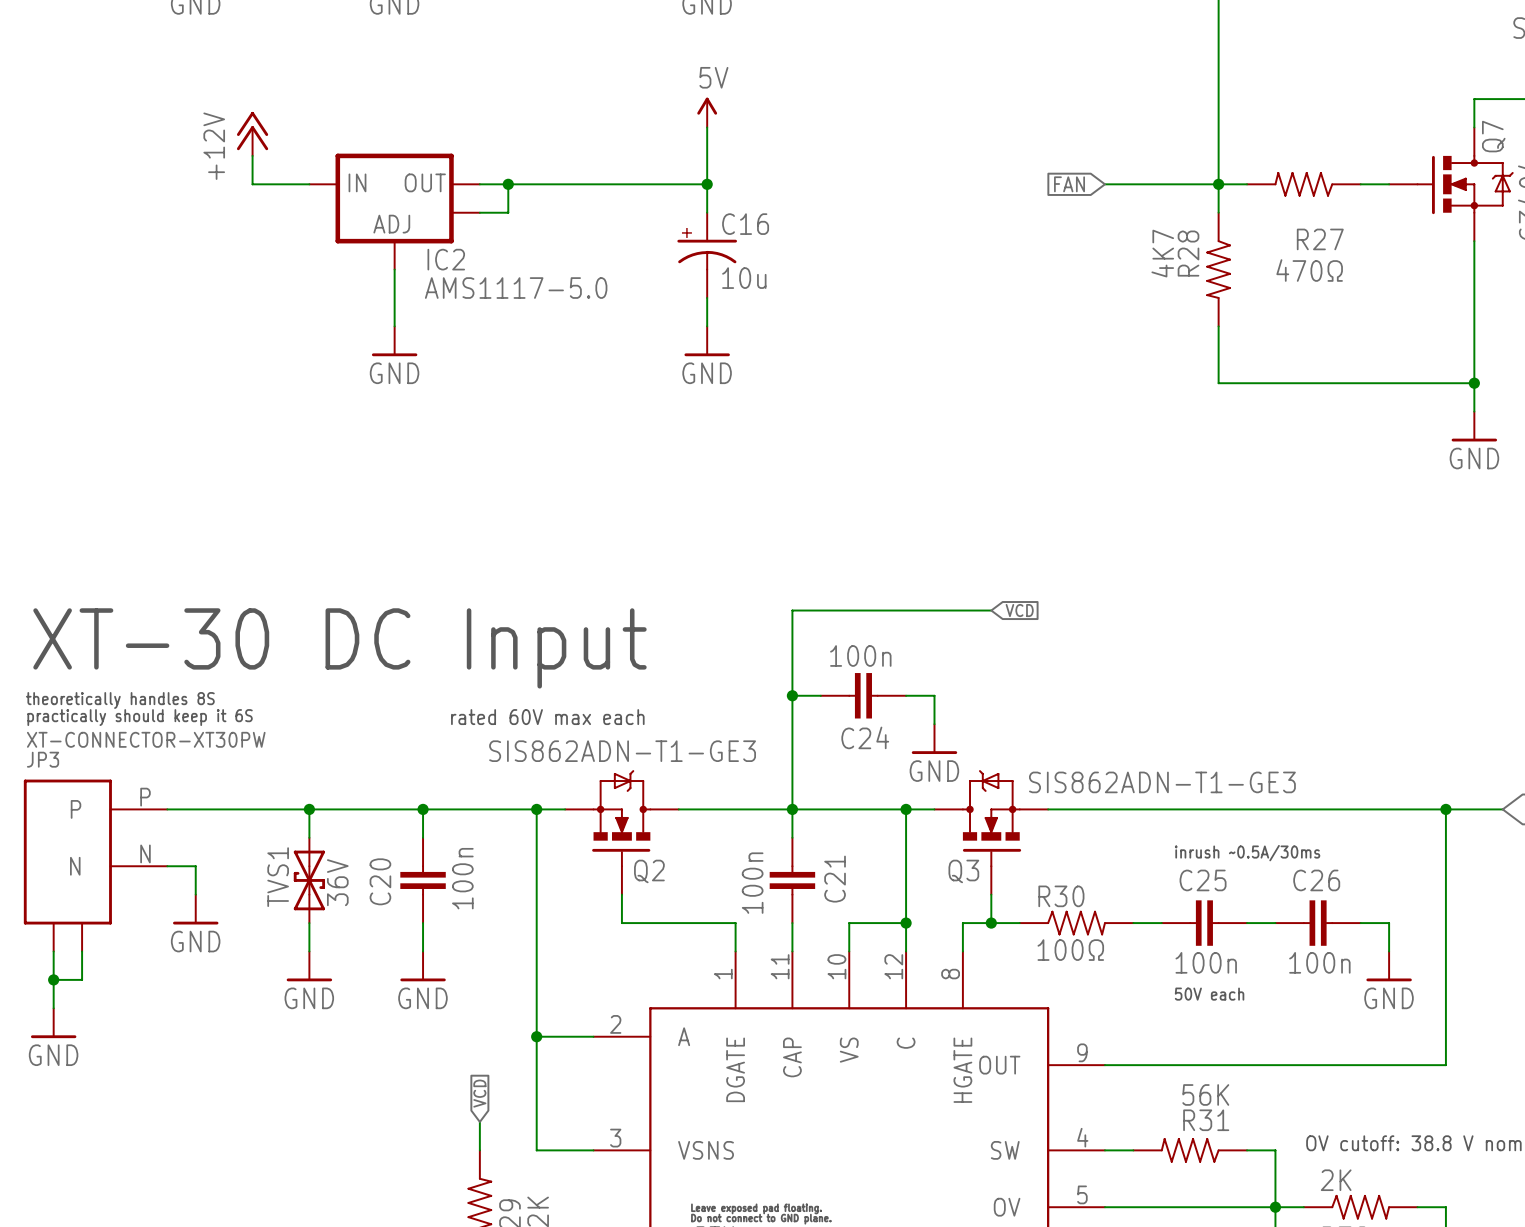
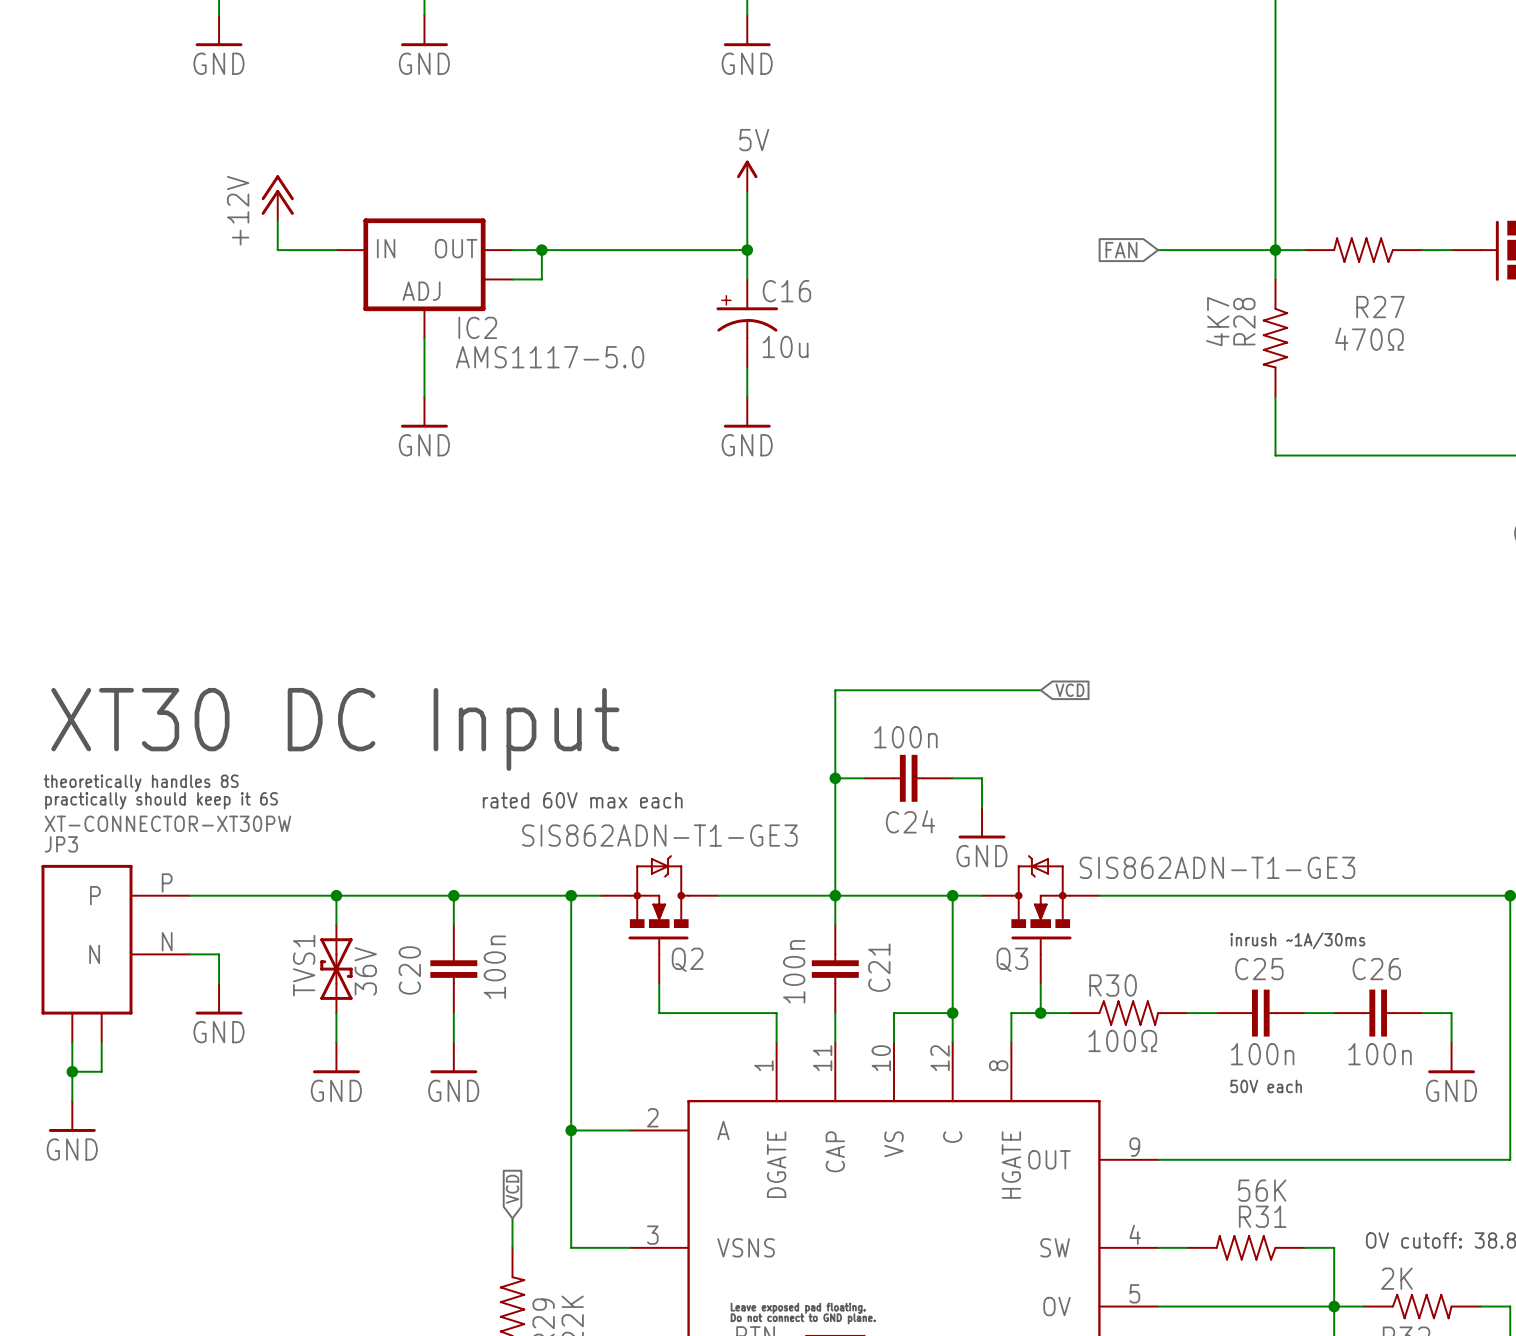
text: XT-30 DC Input (339, 648) -> XT30 DC Input (335, 729)
text: inrush ~0.5A/30ms (1247, 853) -> inrush ~1A/30ms (1297, 940)

